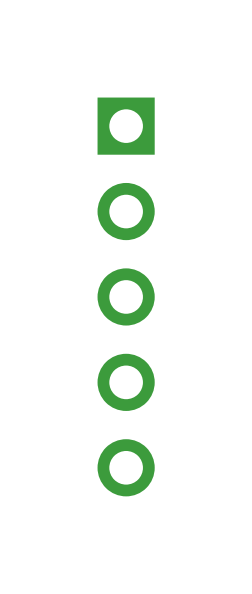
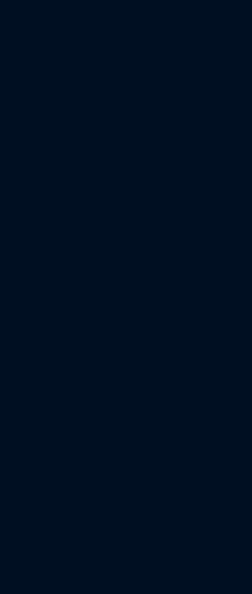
part: (126, 296) -> none

